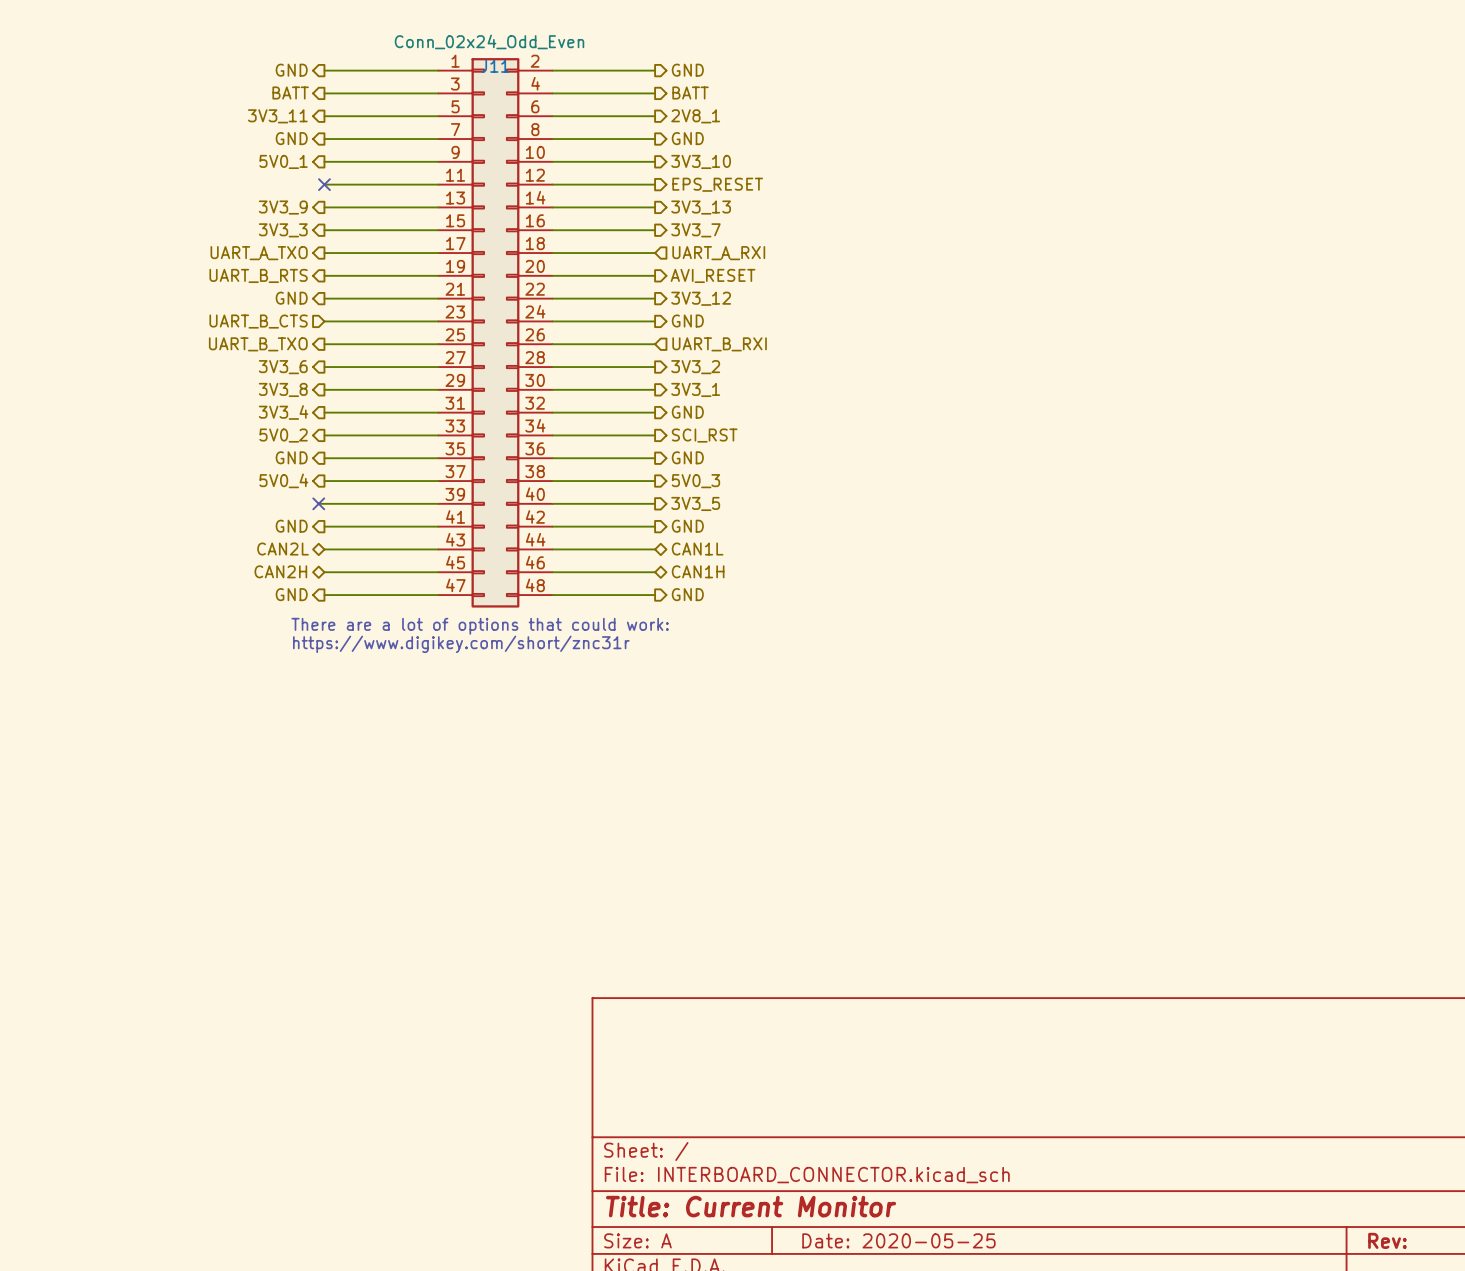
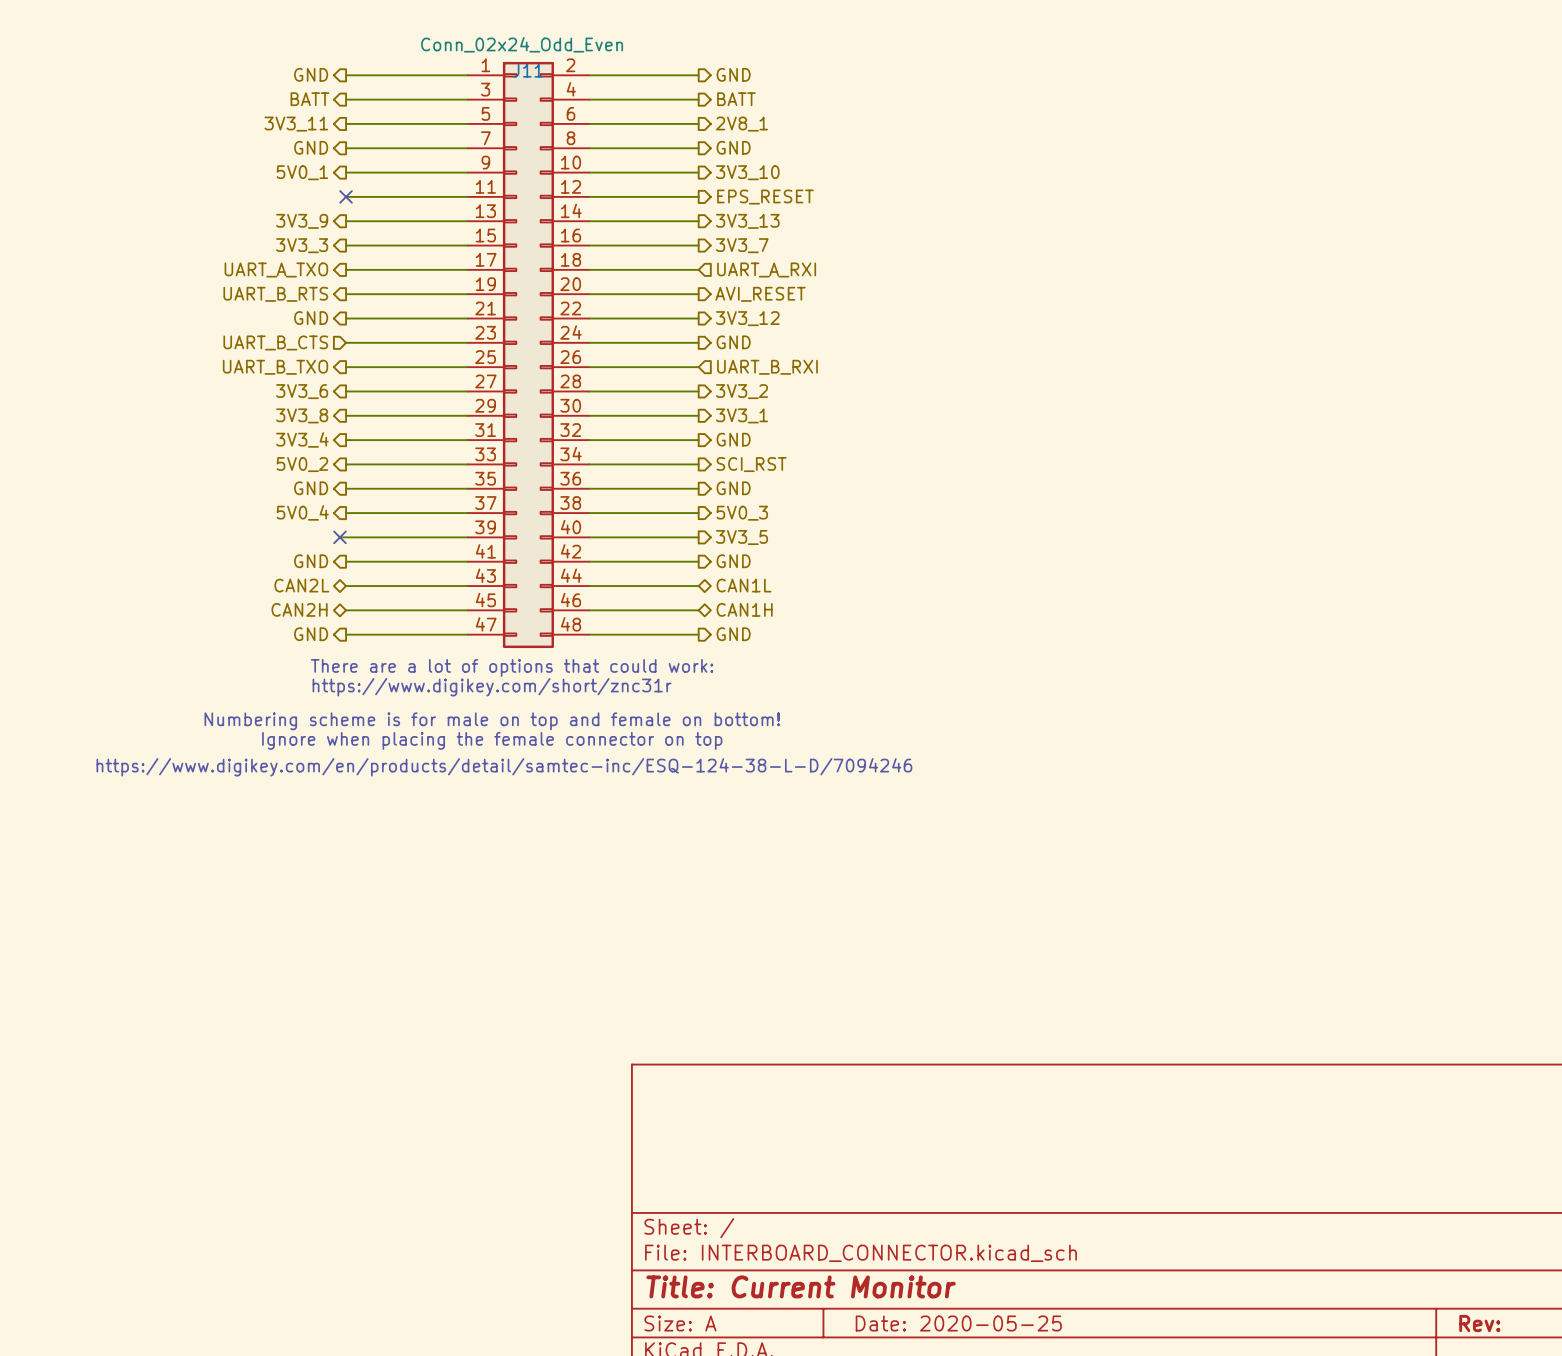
text: none -> Numbering scheme is for male on top and female on bottom! (492, 721)
text: none -> Ignore when placing the female connector on top (492, 740)
text: none -> https://www.digikey.com/en/products/detail/samtec-inc/ESQ-124-38-L-D/7094246 (504, 767)

